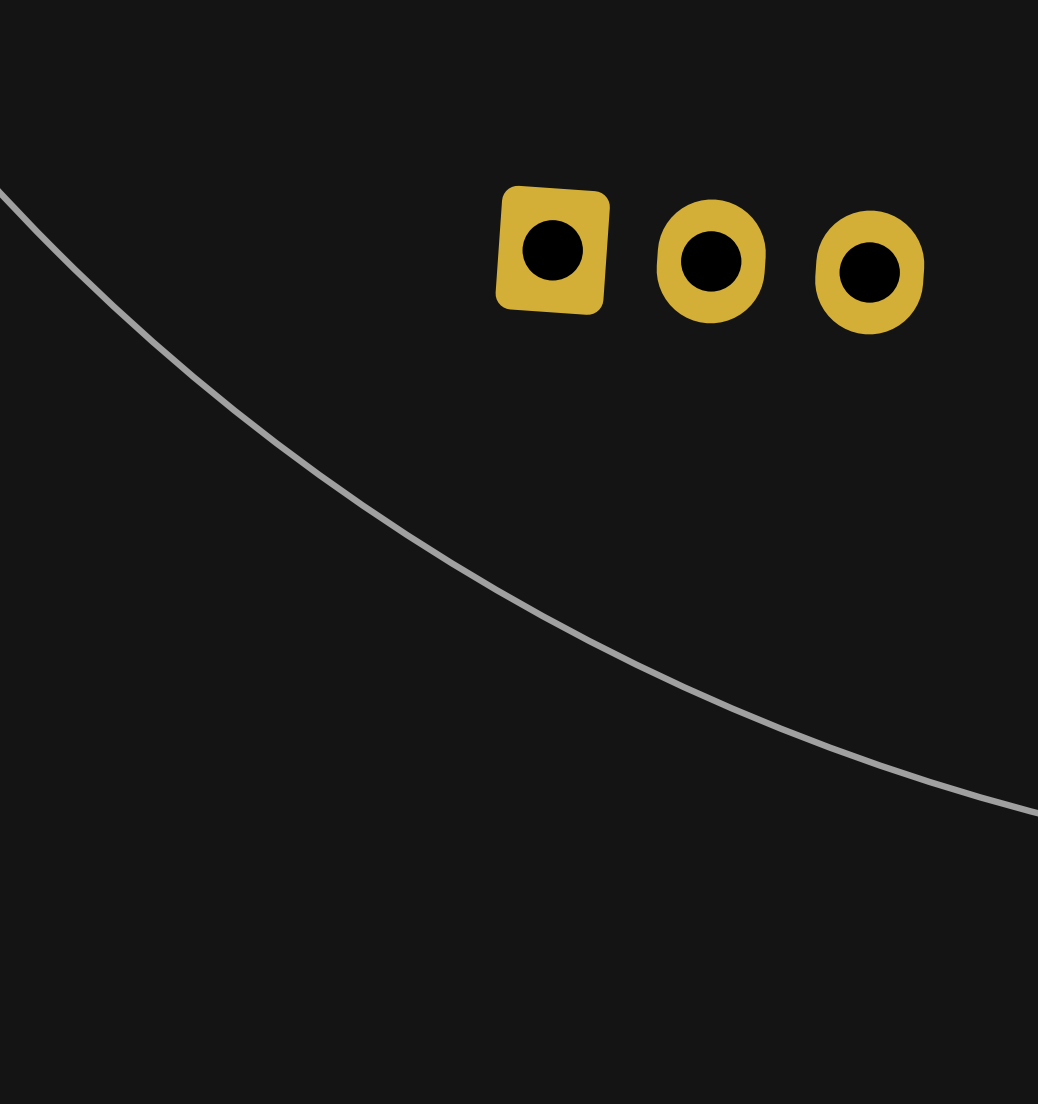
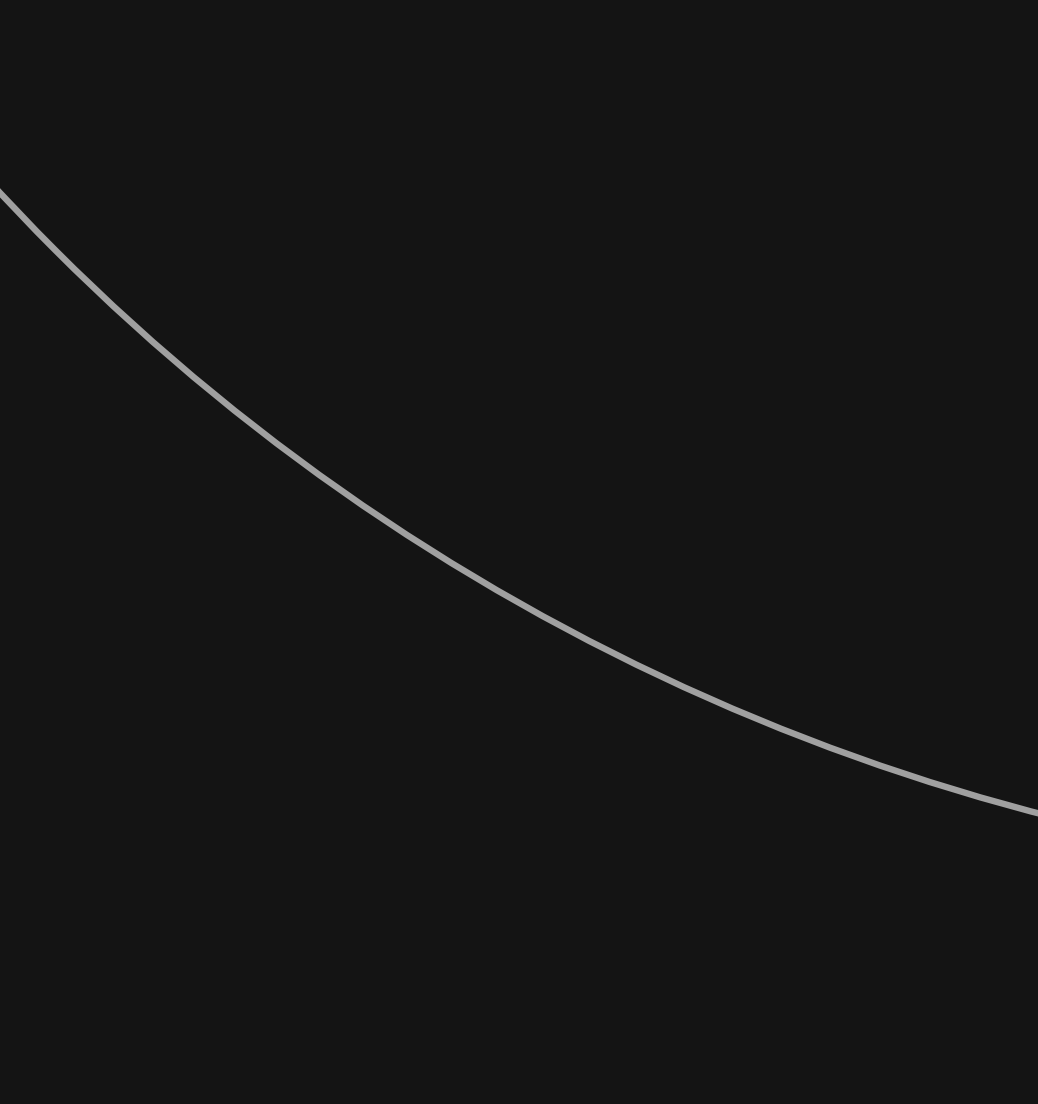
part: (709, 260) -> none

